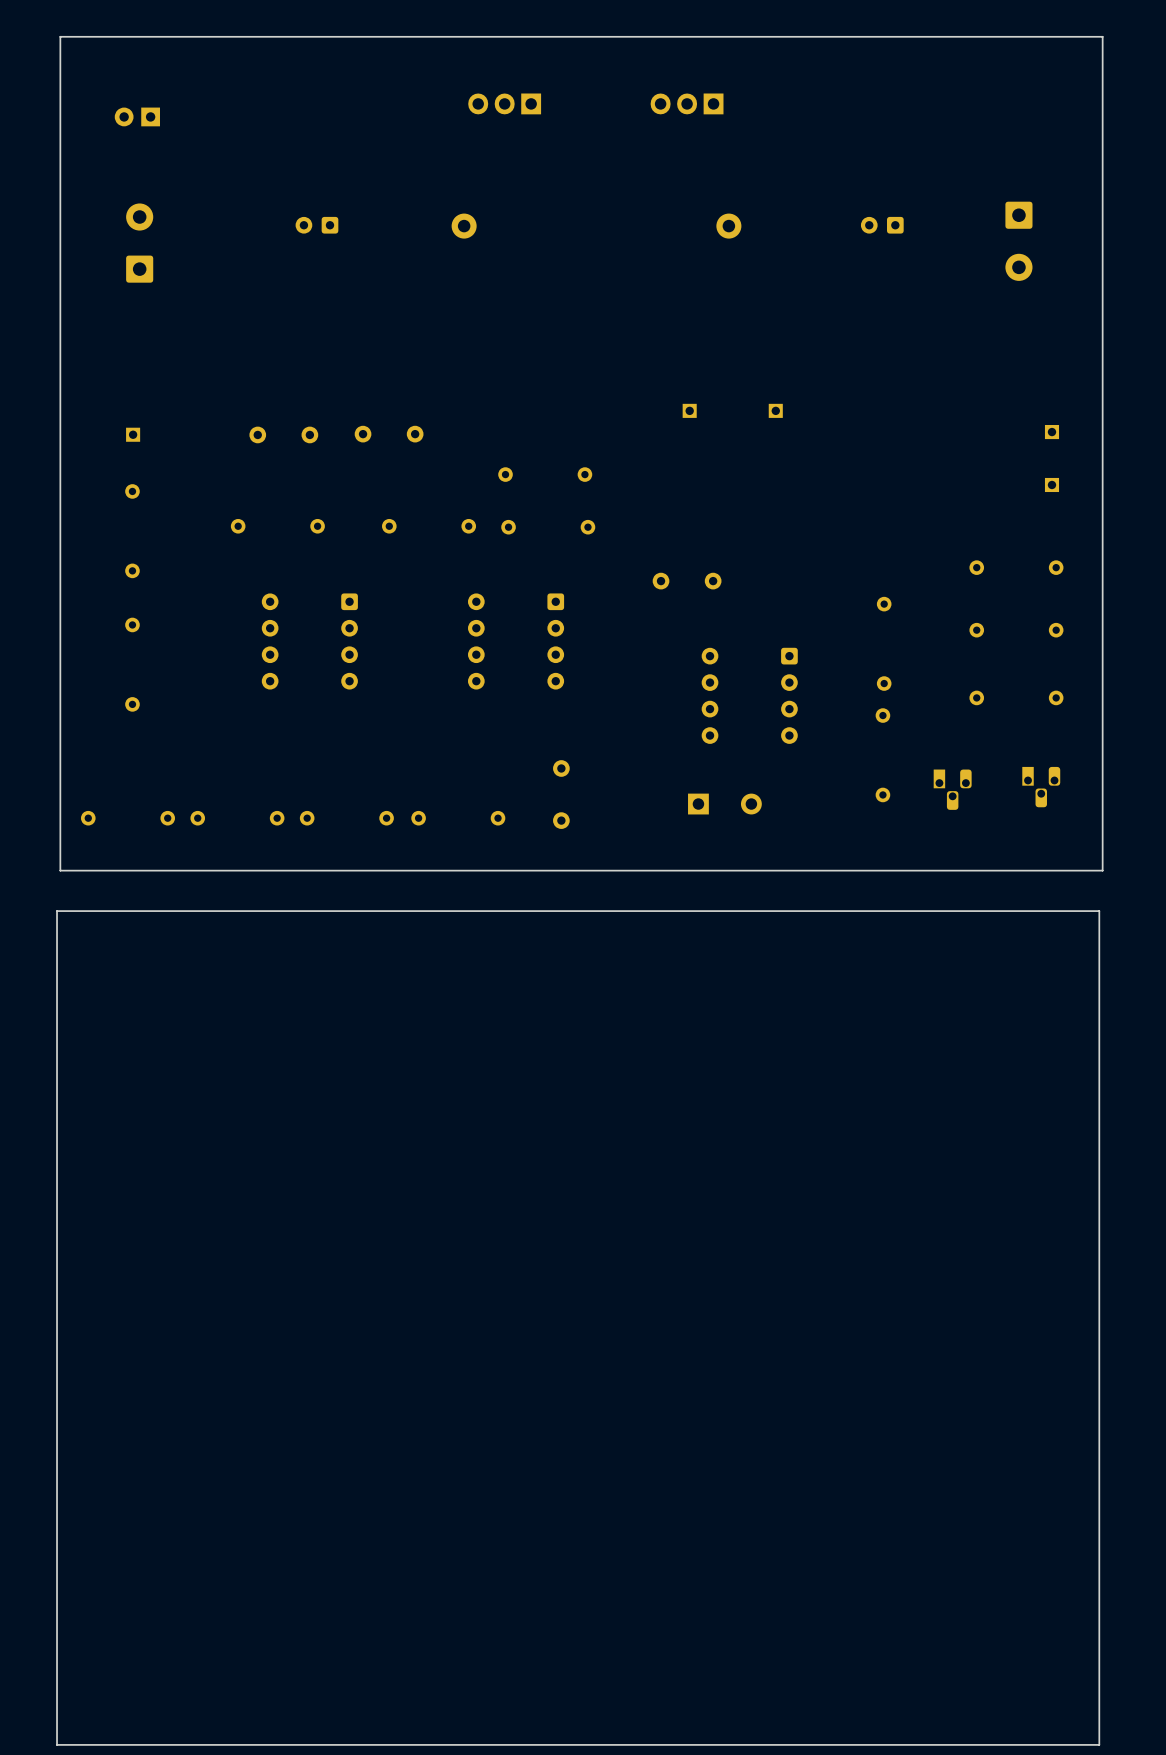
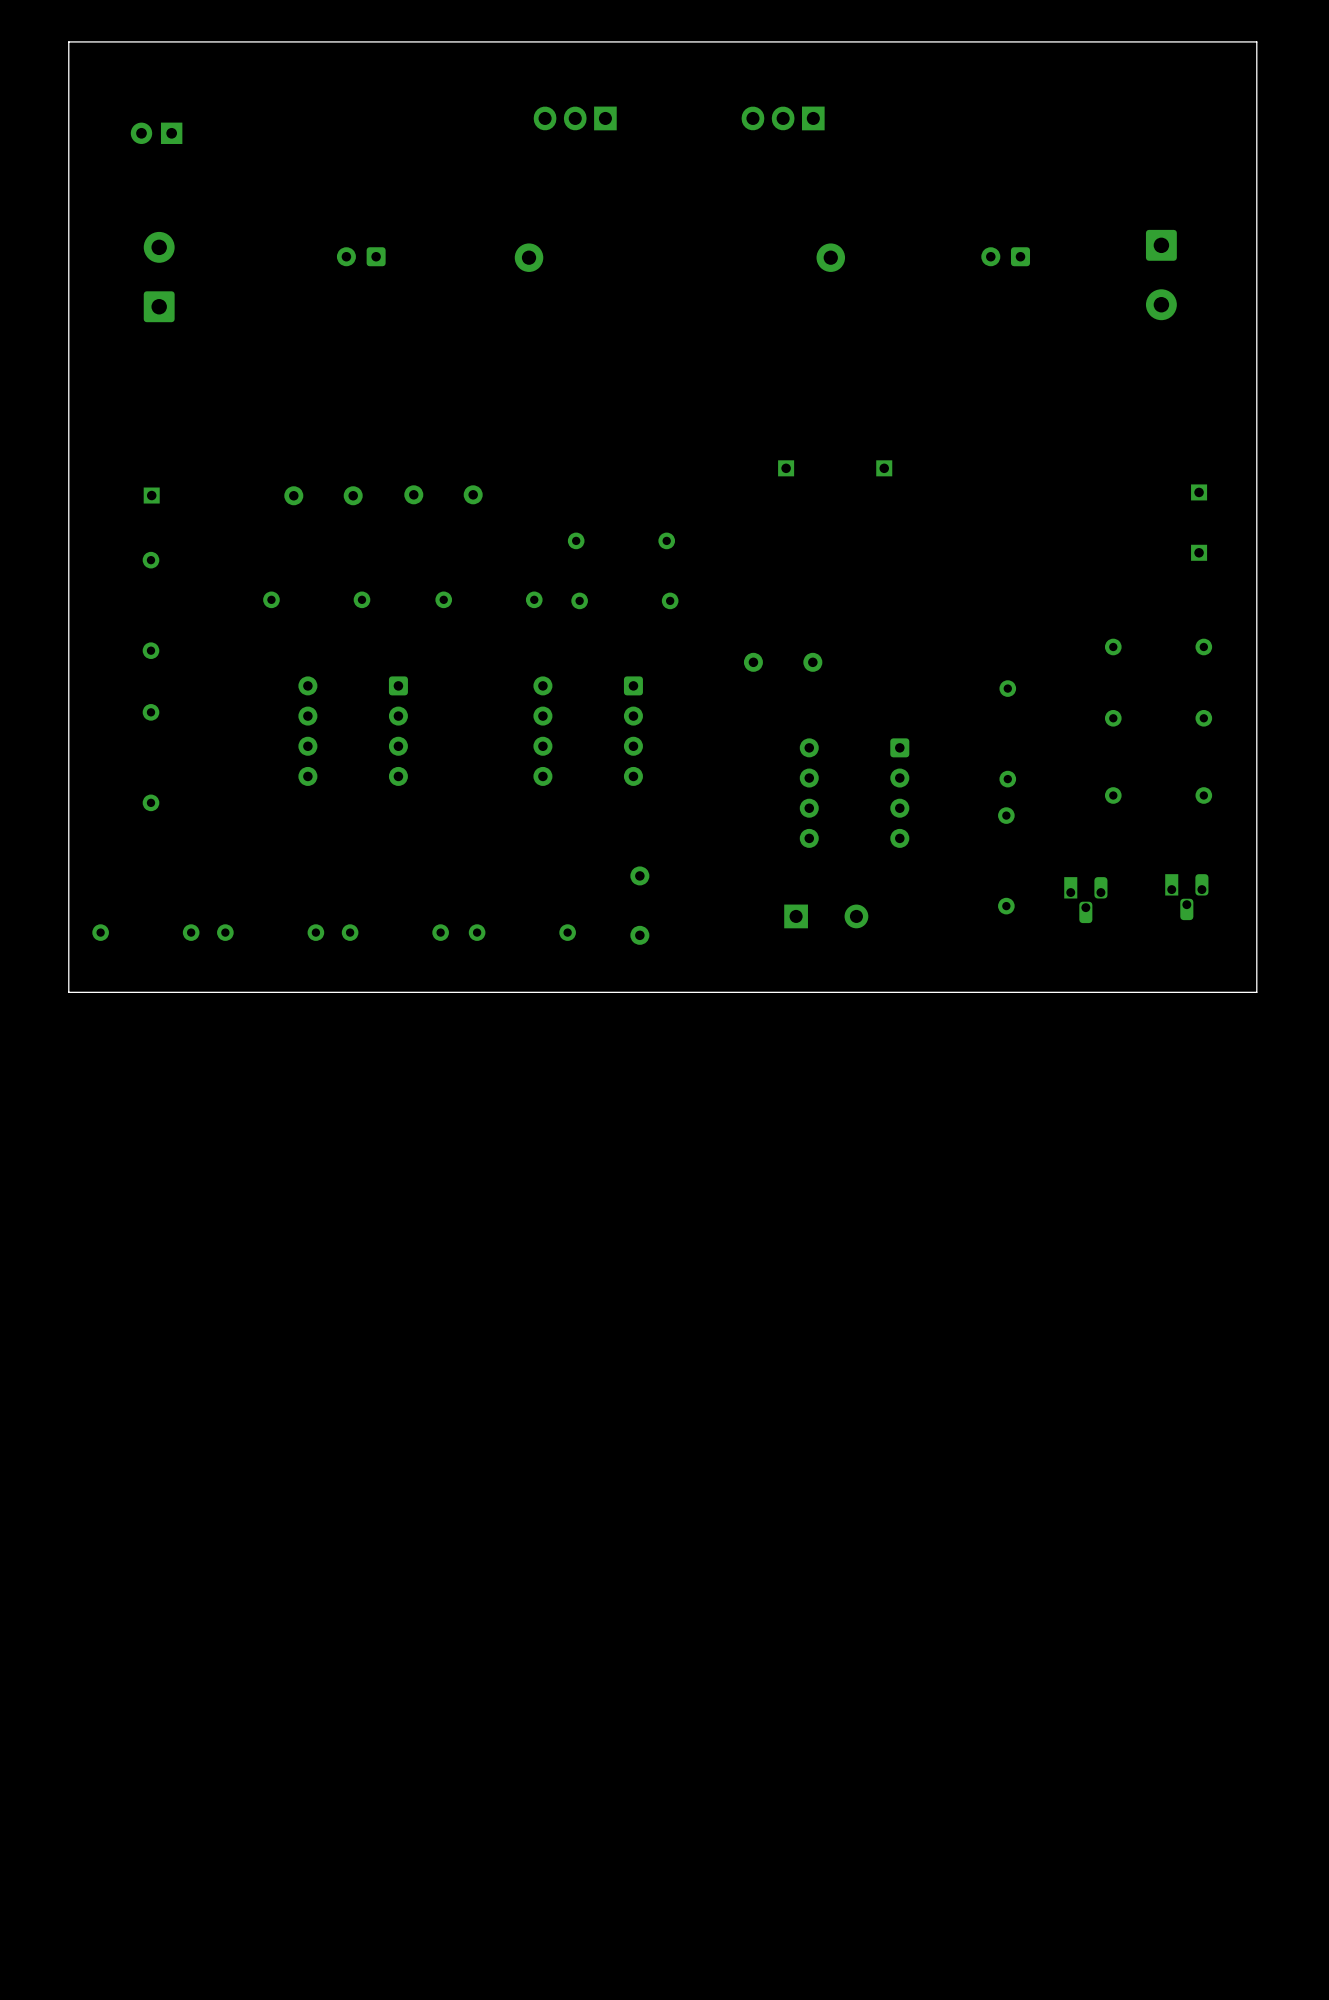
board edge: (1099, 911) (57, 911) (57, 1744) (1099, 1744) (1099, 911) -> none

